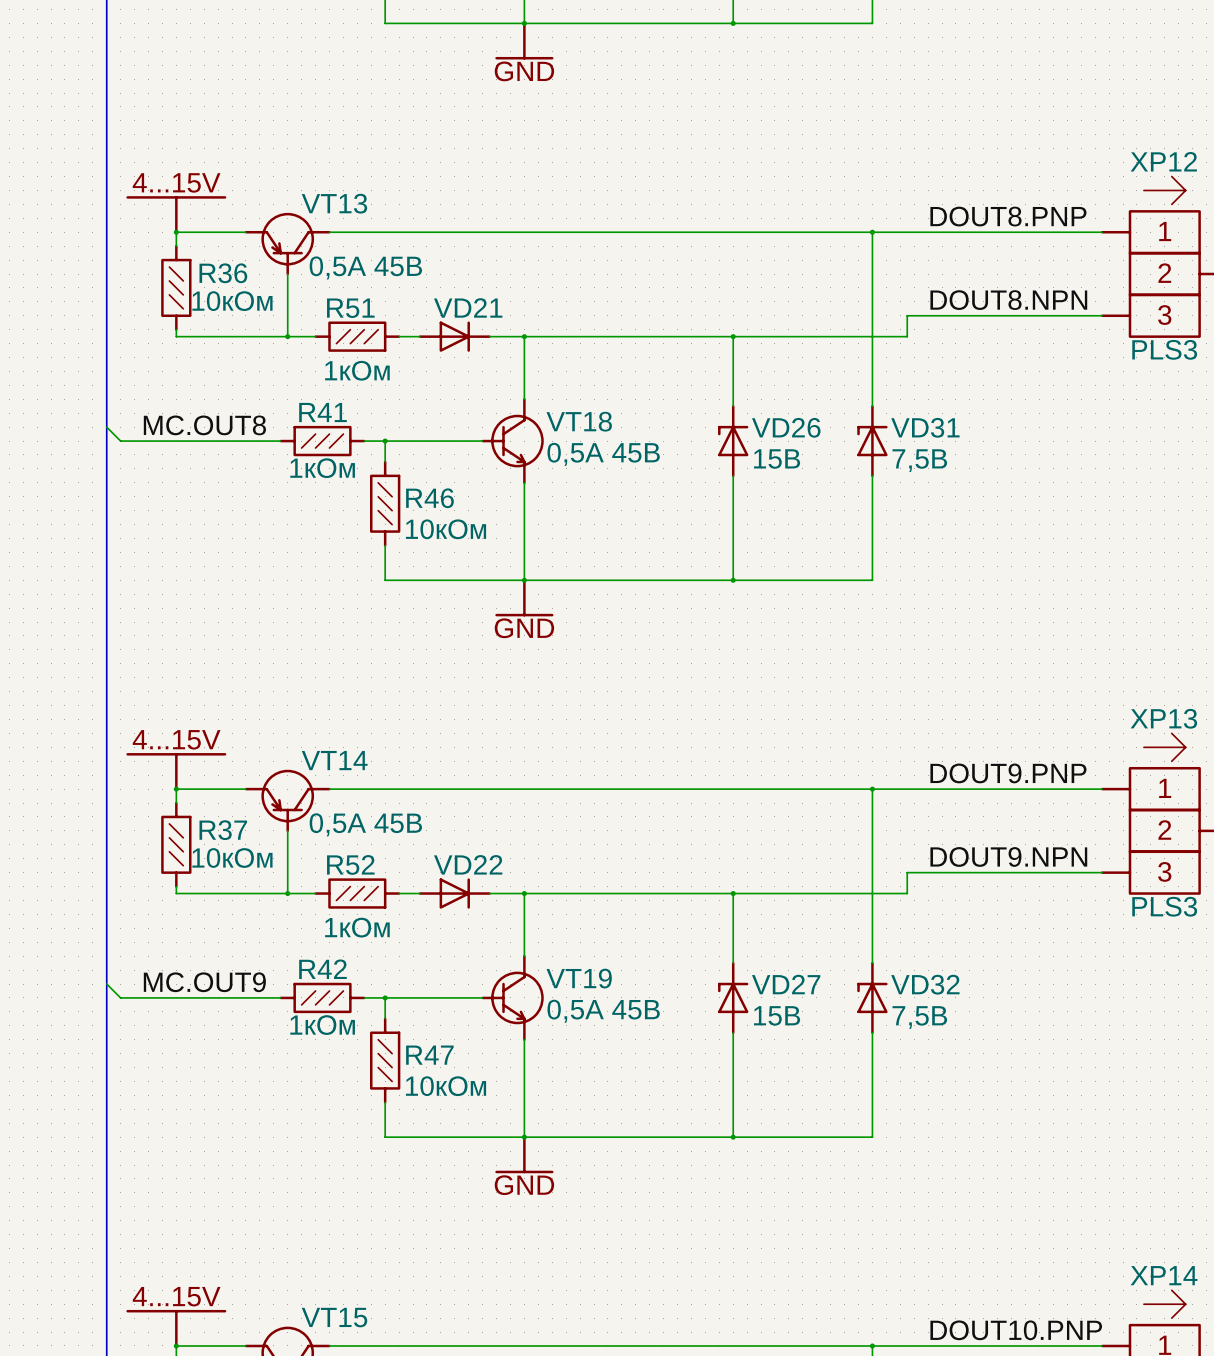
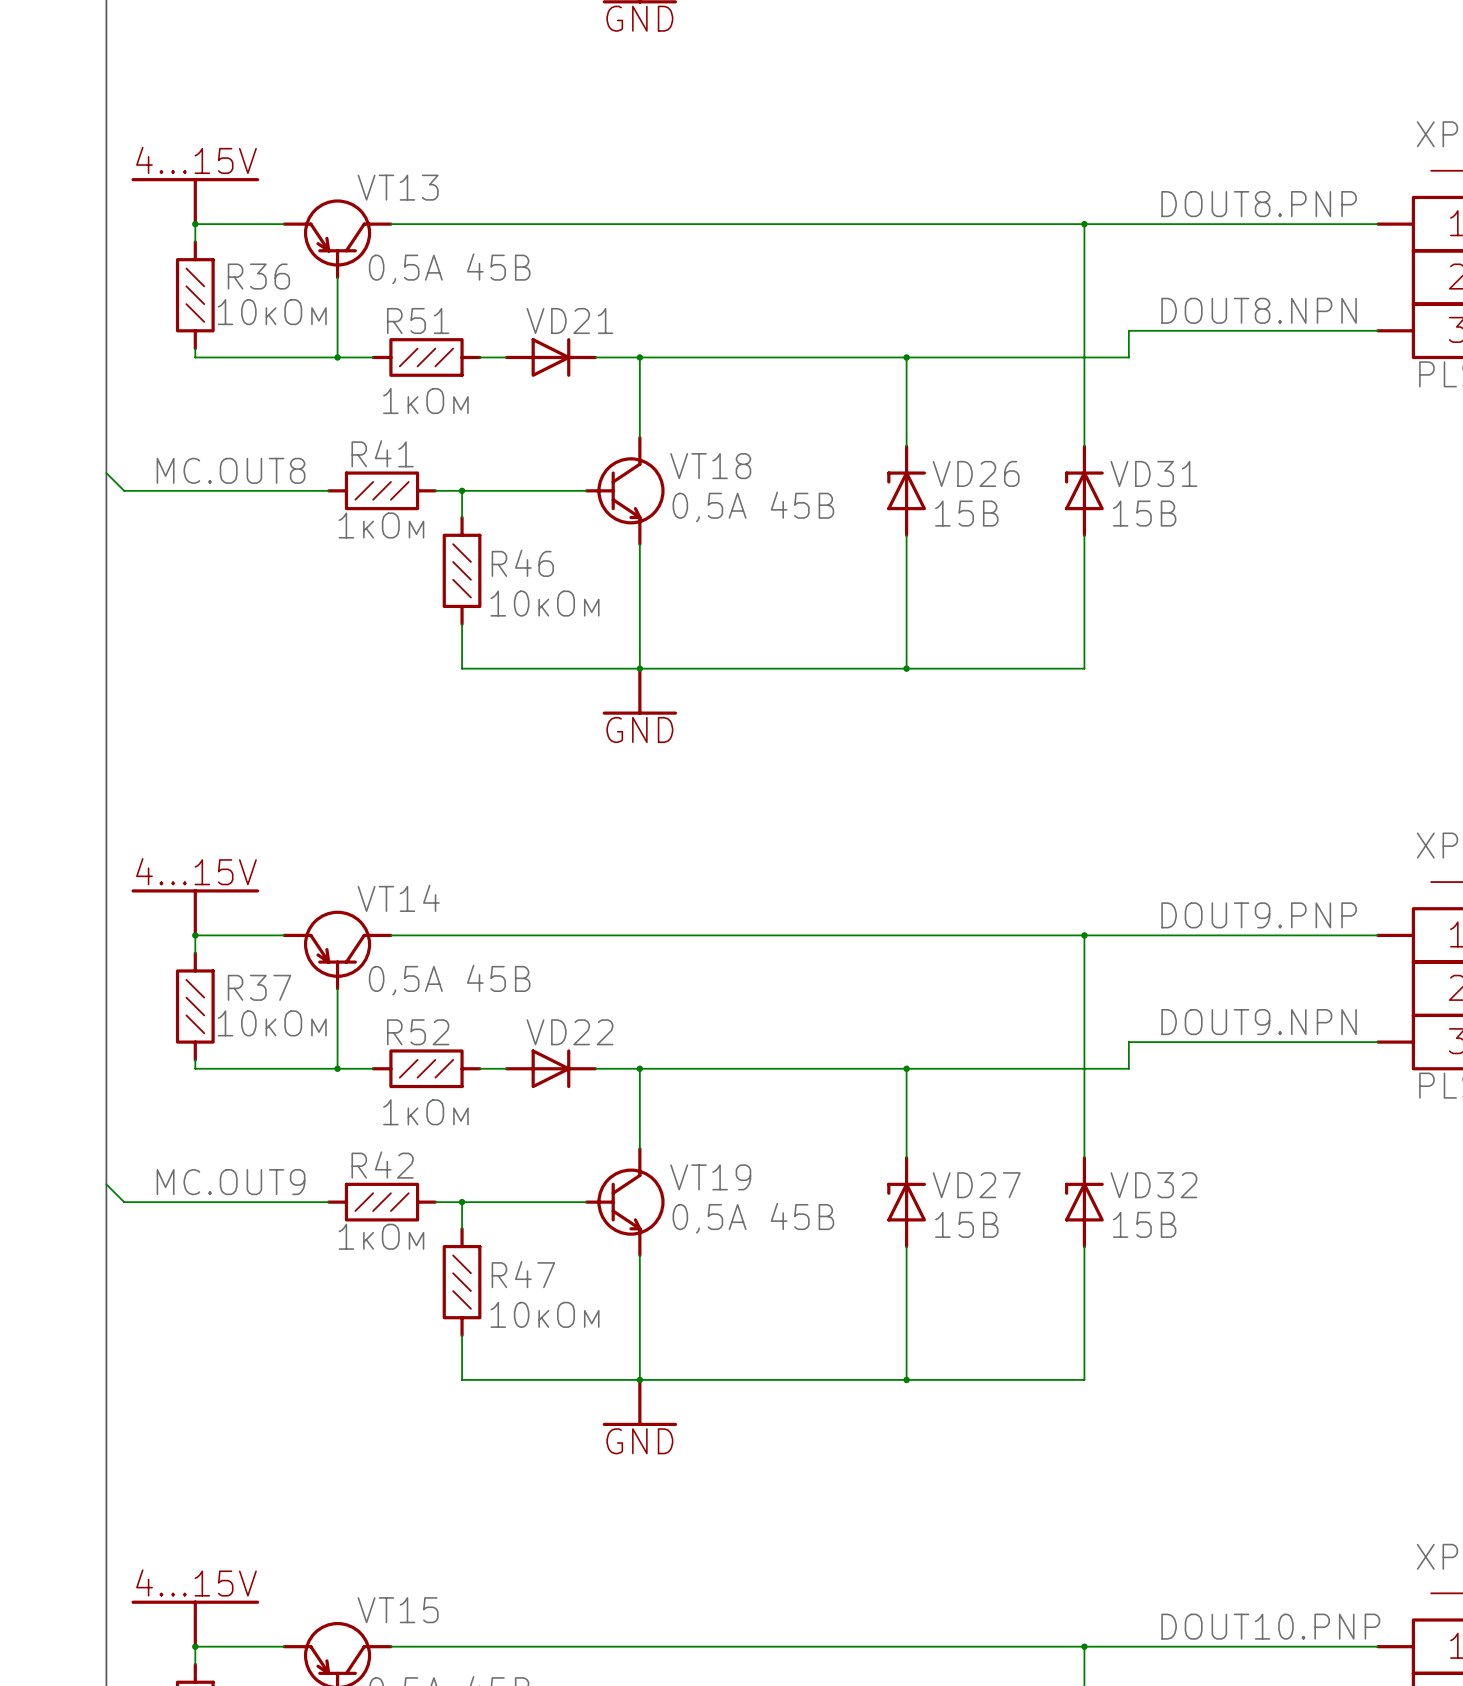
VD31 text: 7,5В (919, 460) -> 15В (1144, 513)
VD32 text: 7,5В (919, 1017) -> 15В (1144, 1224)

